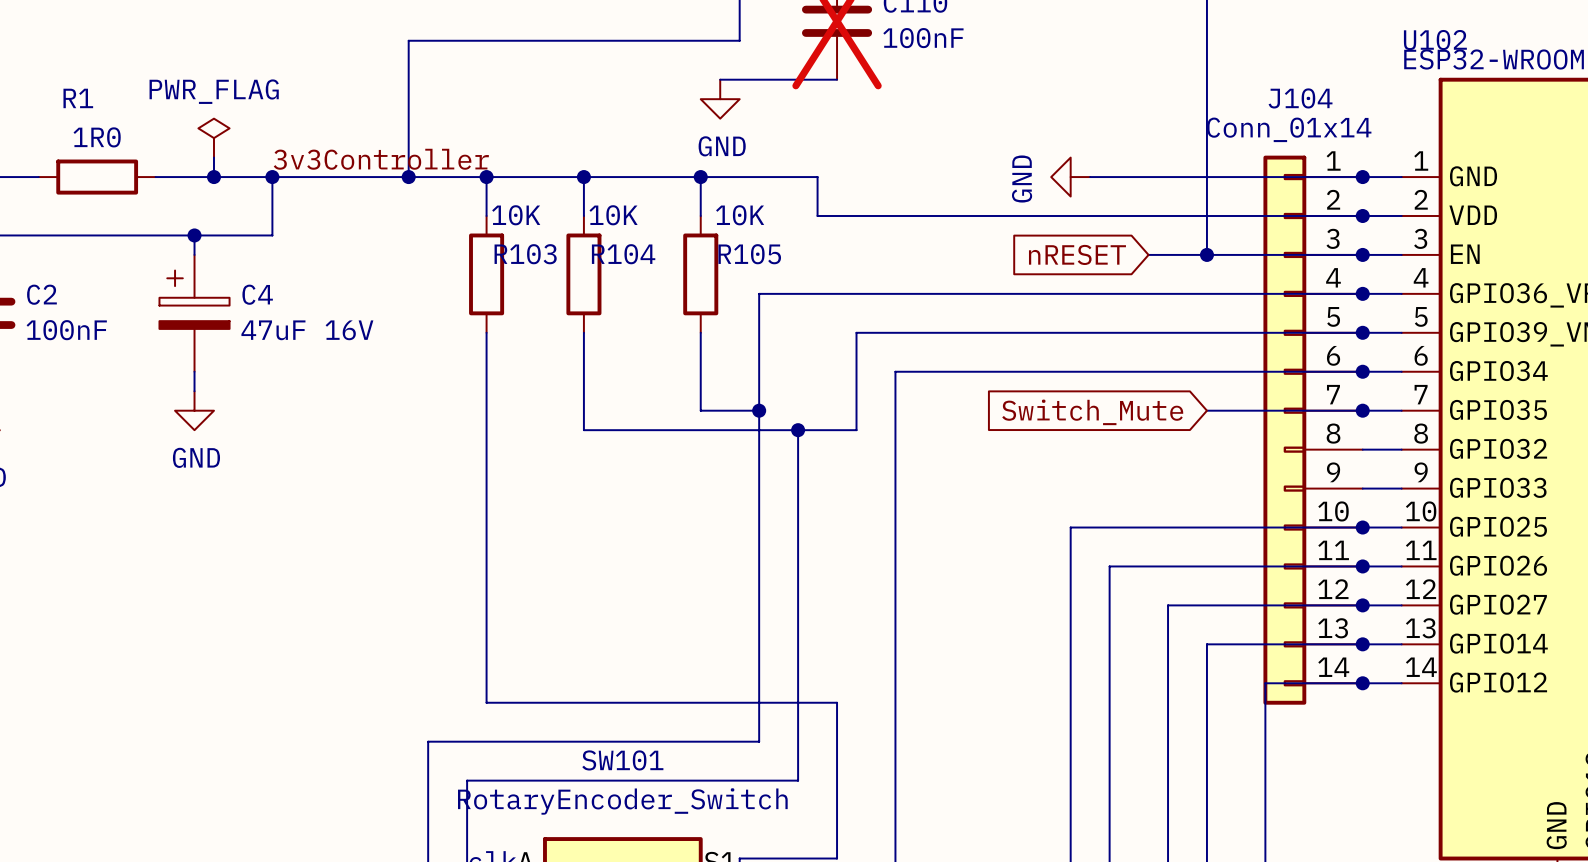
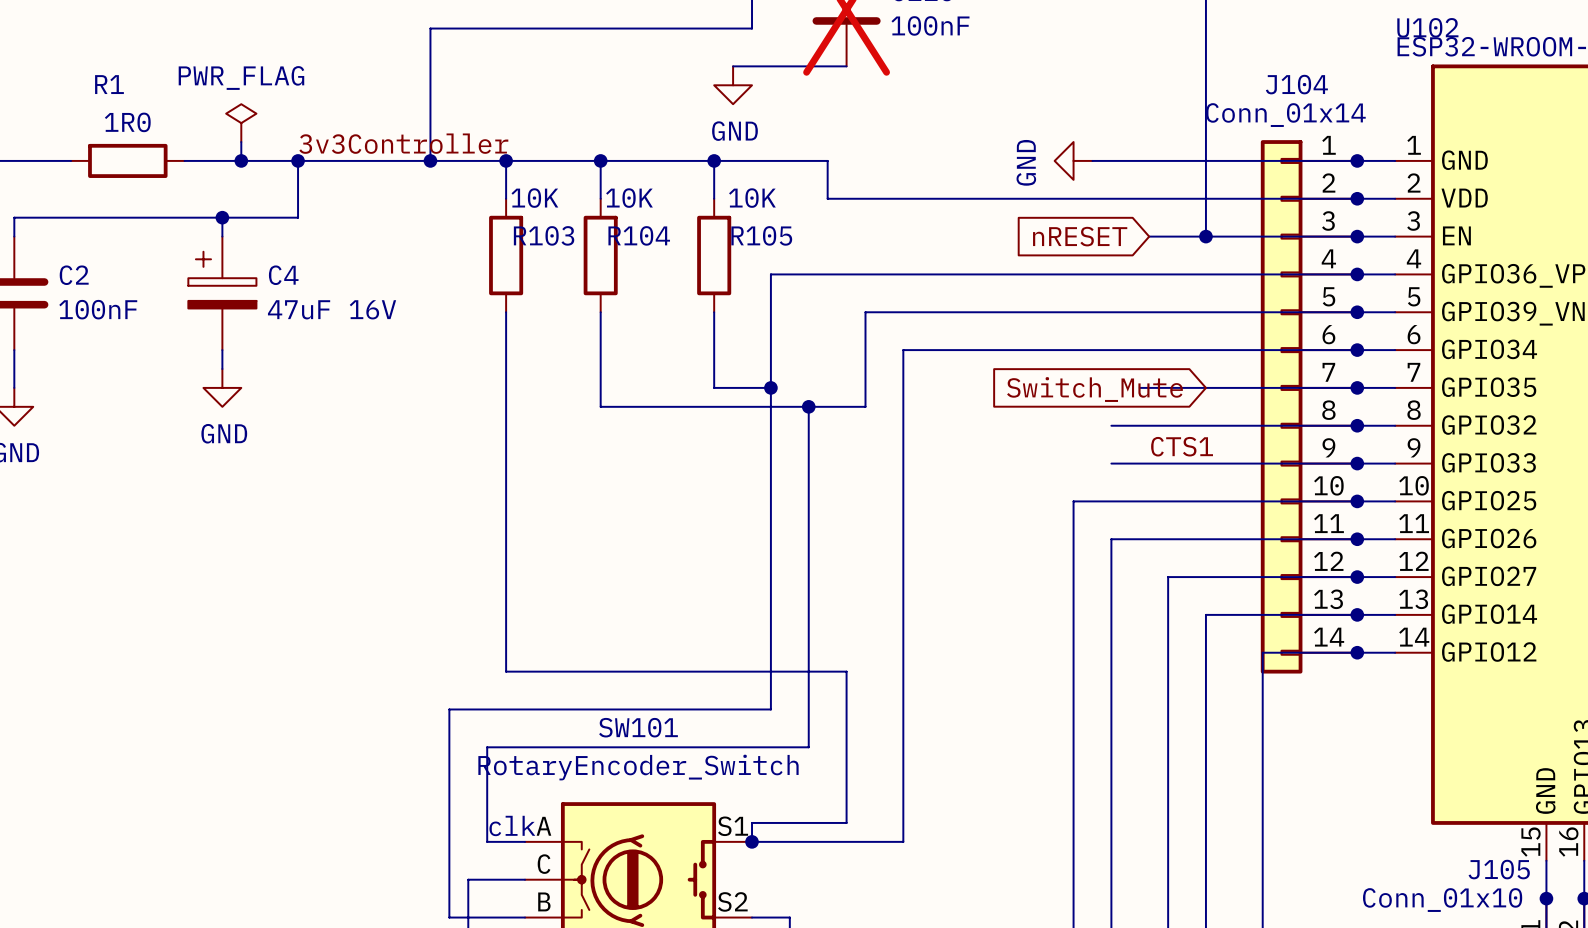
wire: none -> (1139, 387) (1205, 387)
wire: none -> (1111, 425) (1357, 425)
junction: none -> (1357, 425)
label: none -> CTS1 (1182, 446)
wire: none -> (1111, 463) (1357, 463)
junction: none -> (1357, 463)

